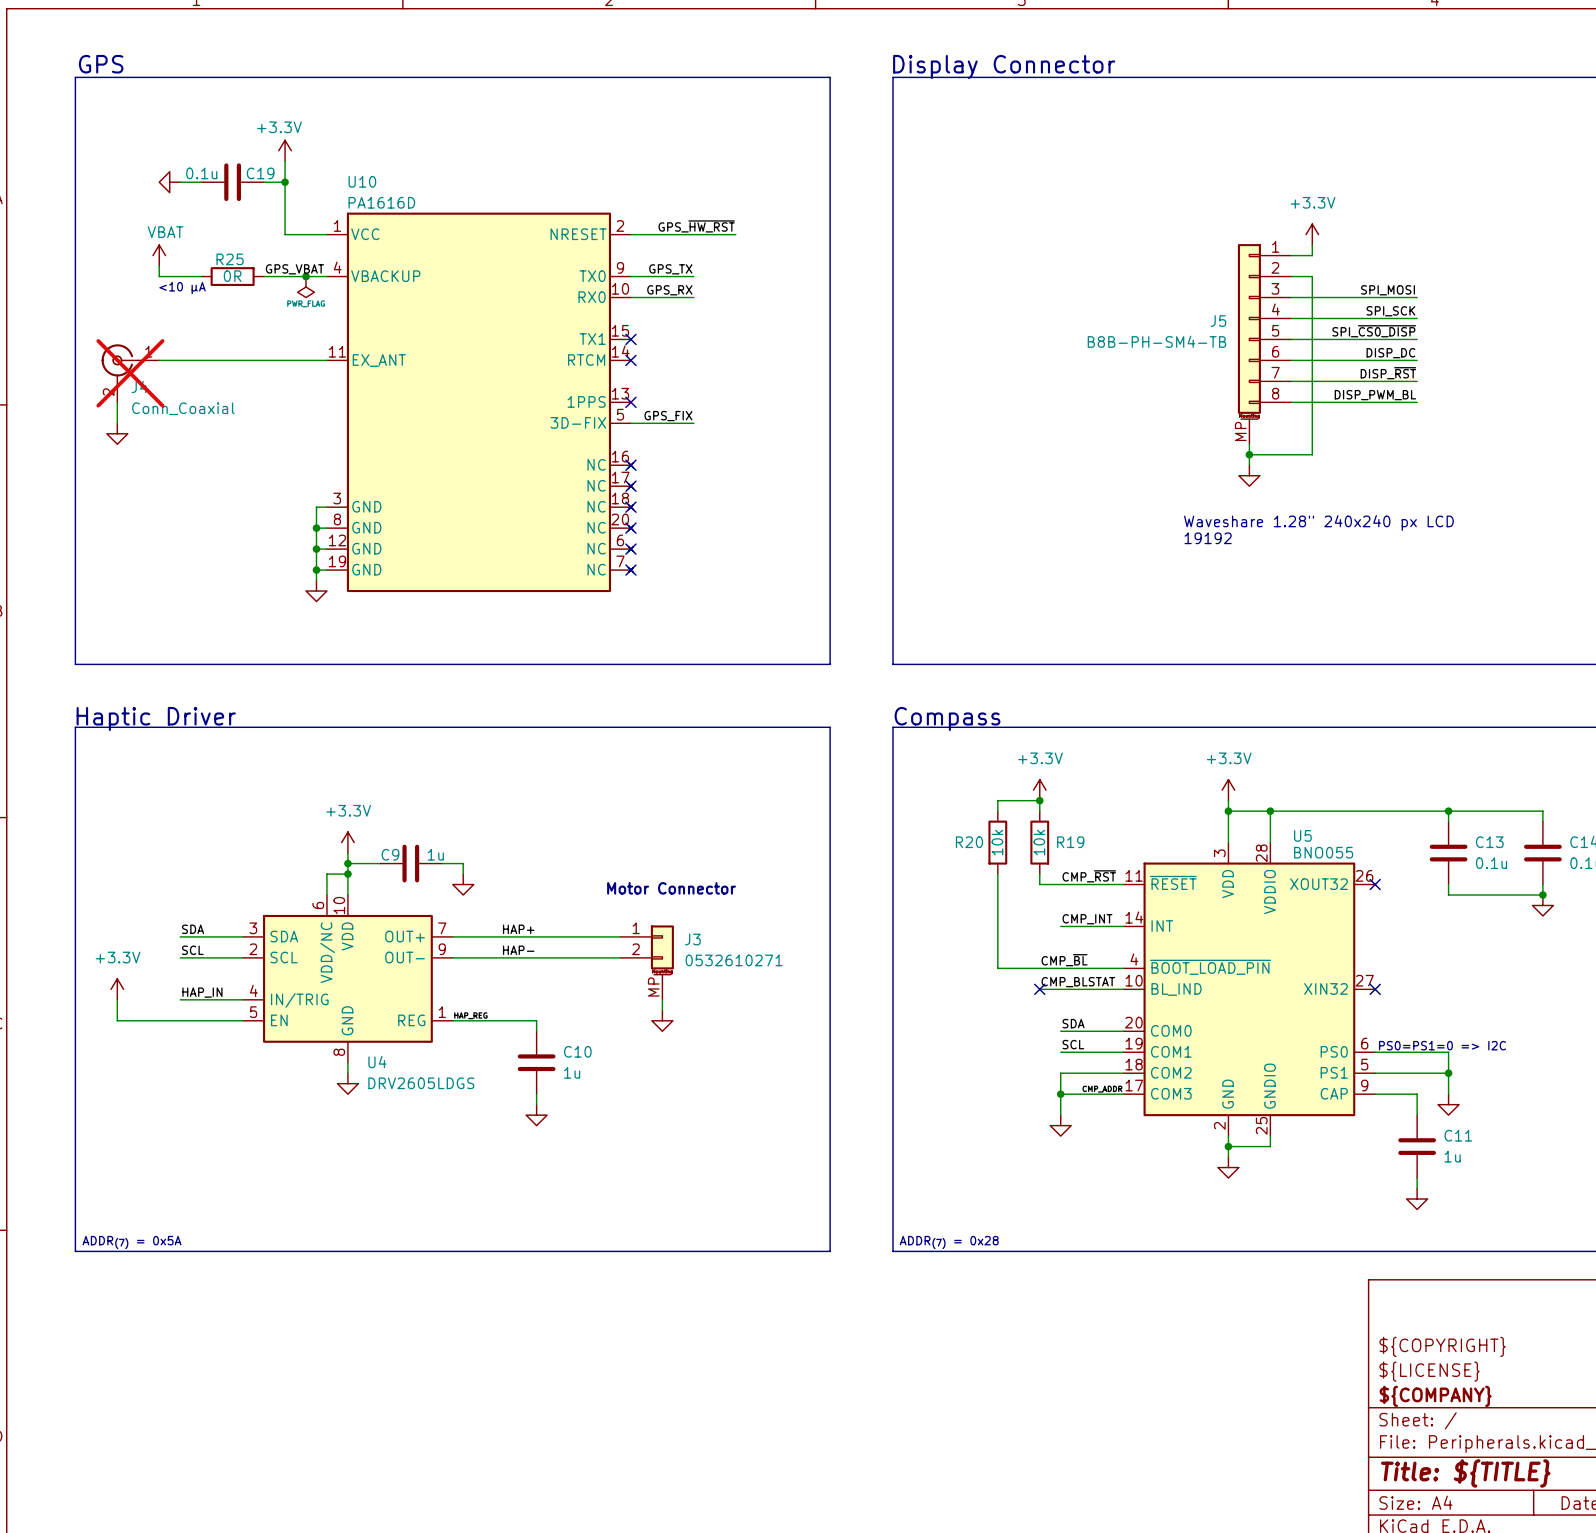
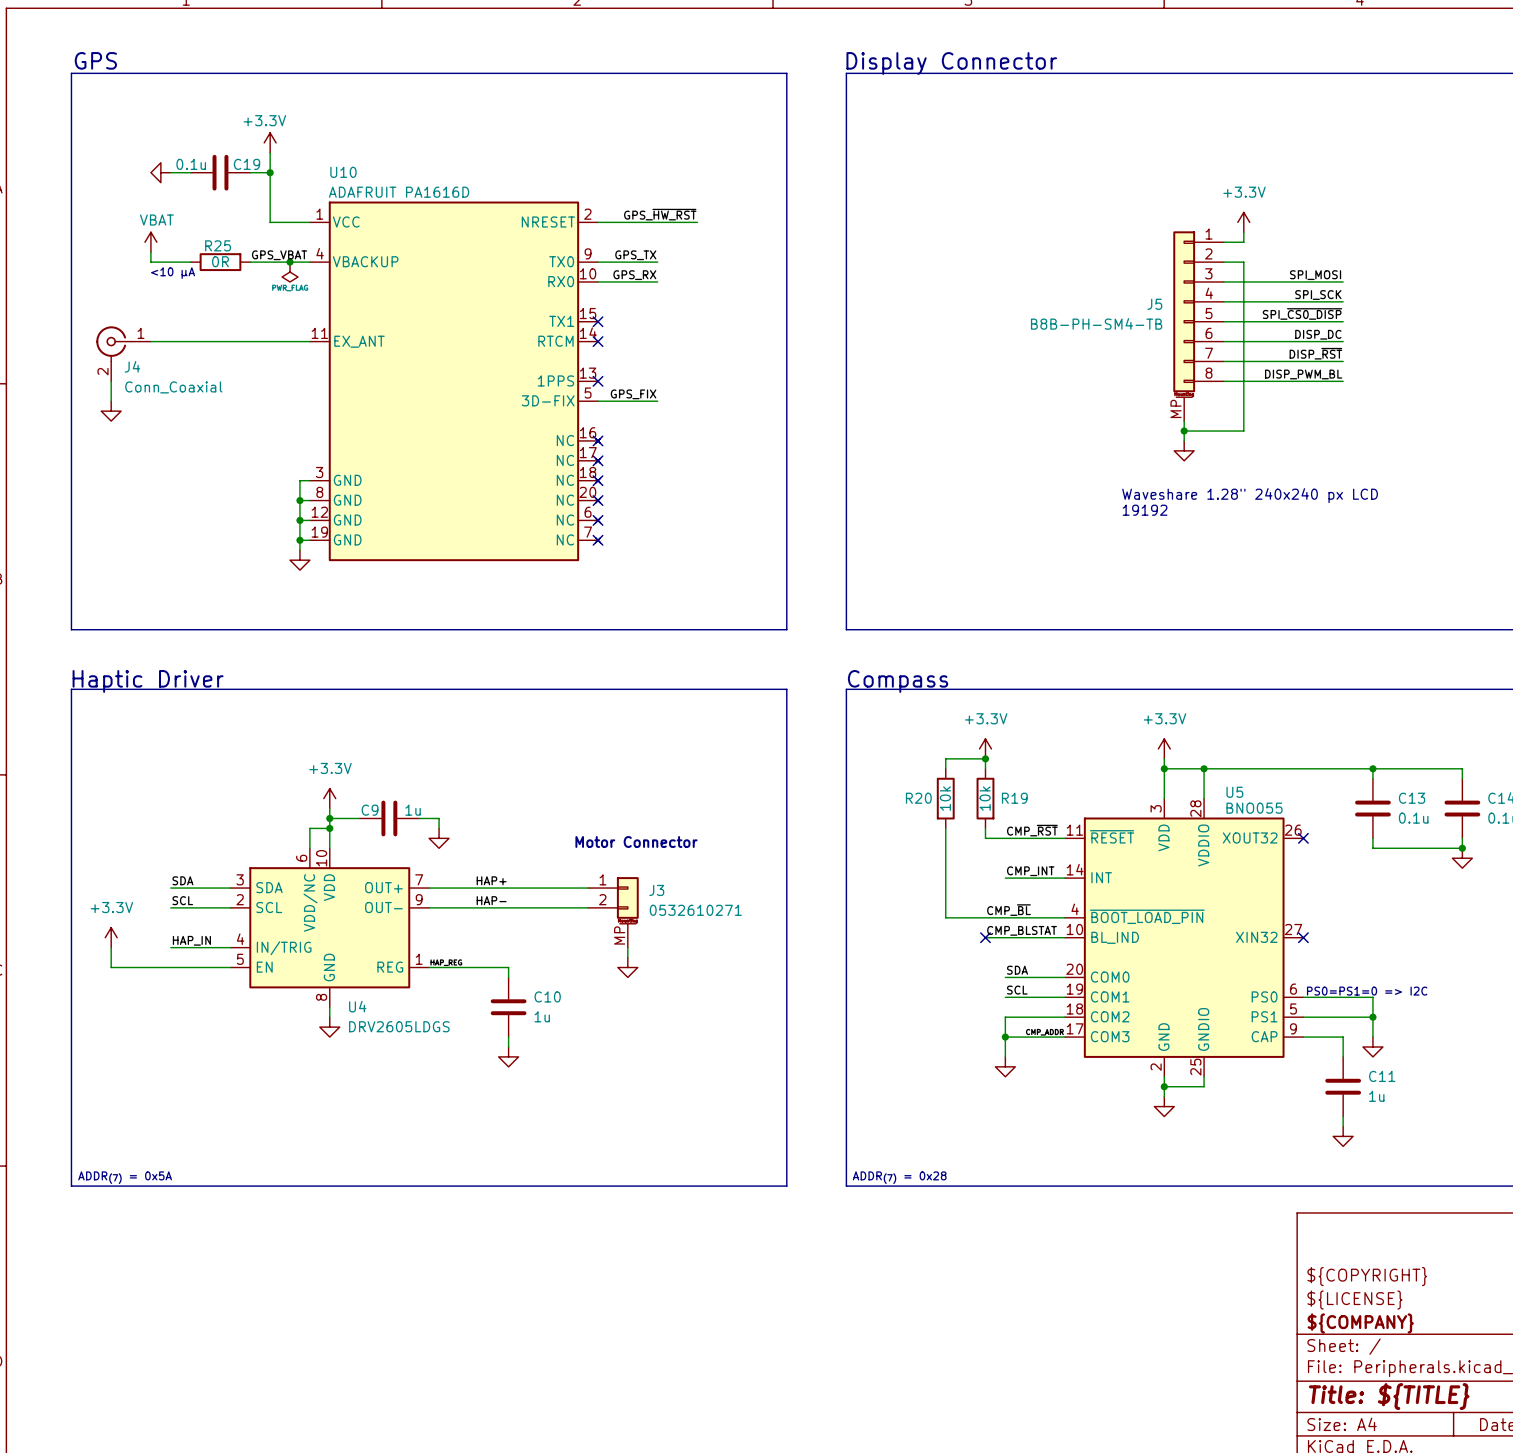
U10 value: PA1616D (381, 202) -> ADAFRUIT PA1616D (399, 192)
J4 do-not-place cross: (130, 373) -> none

